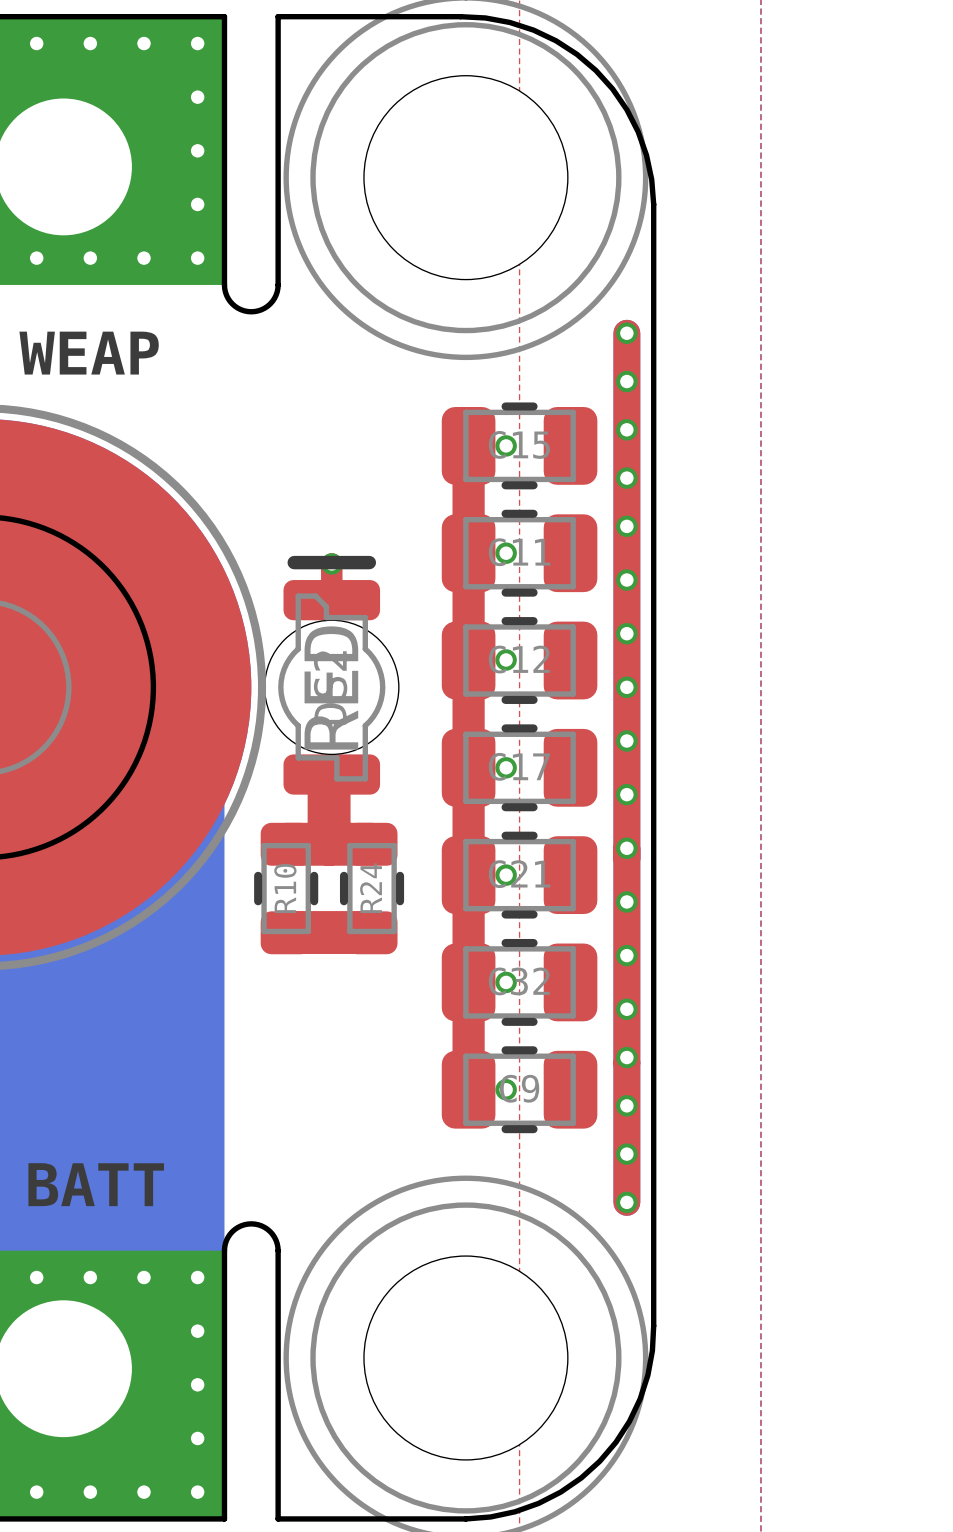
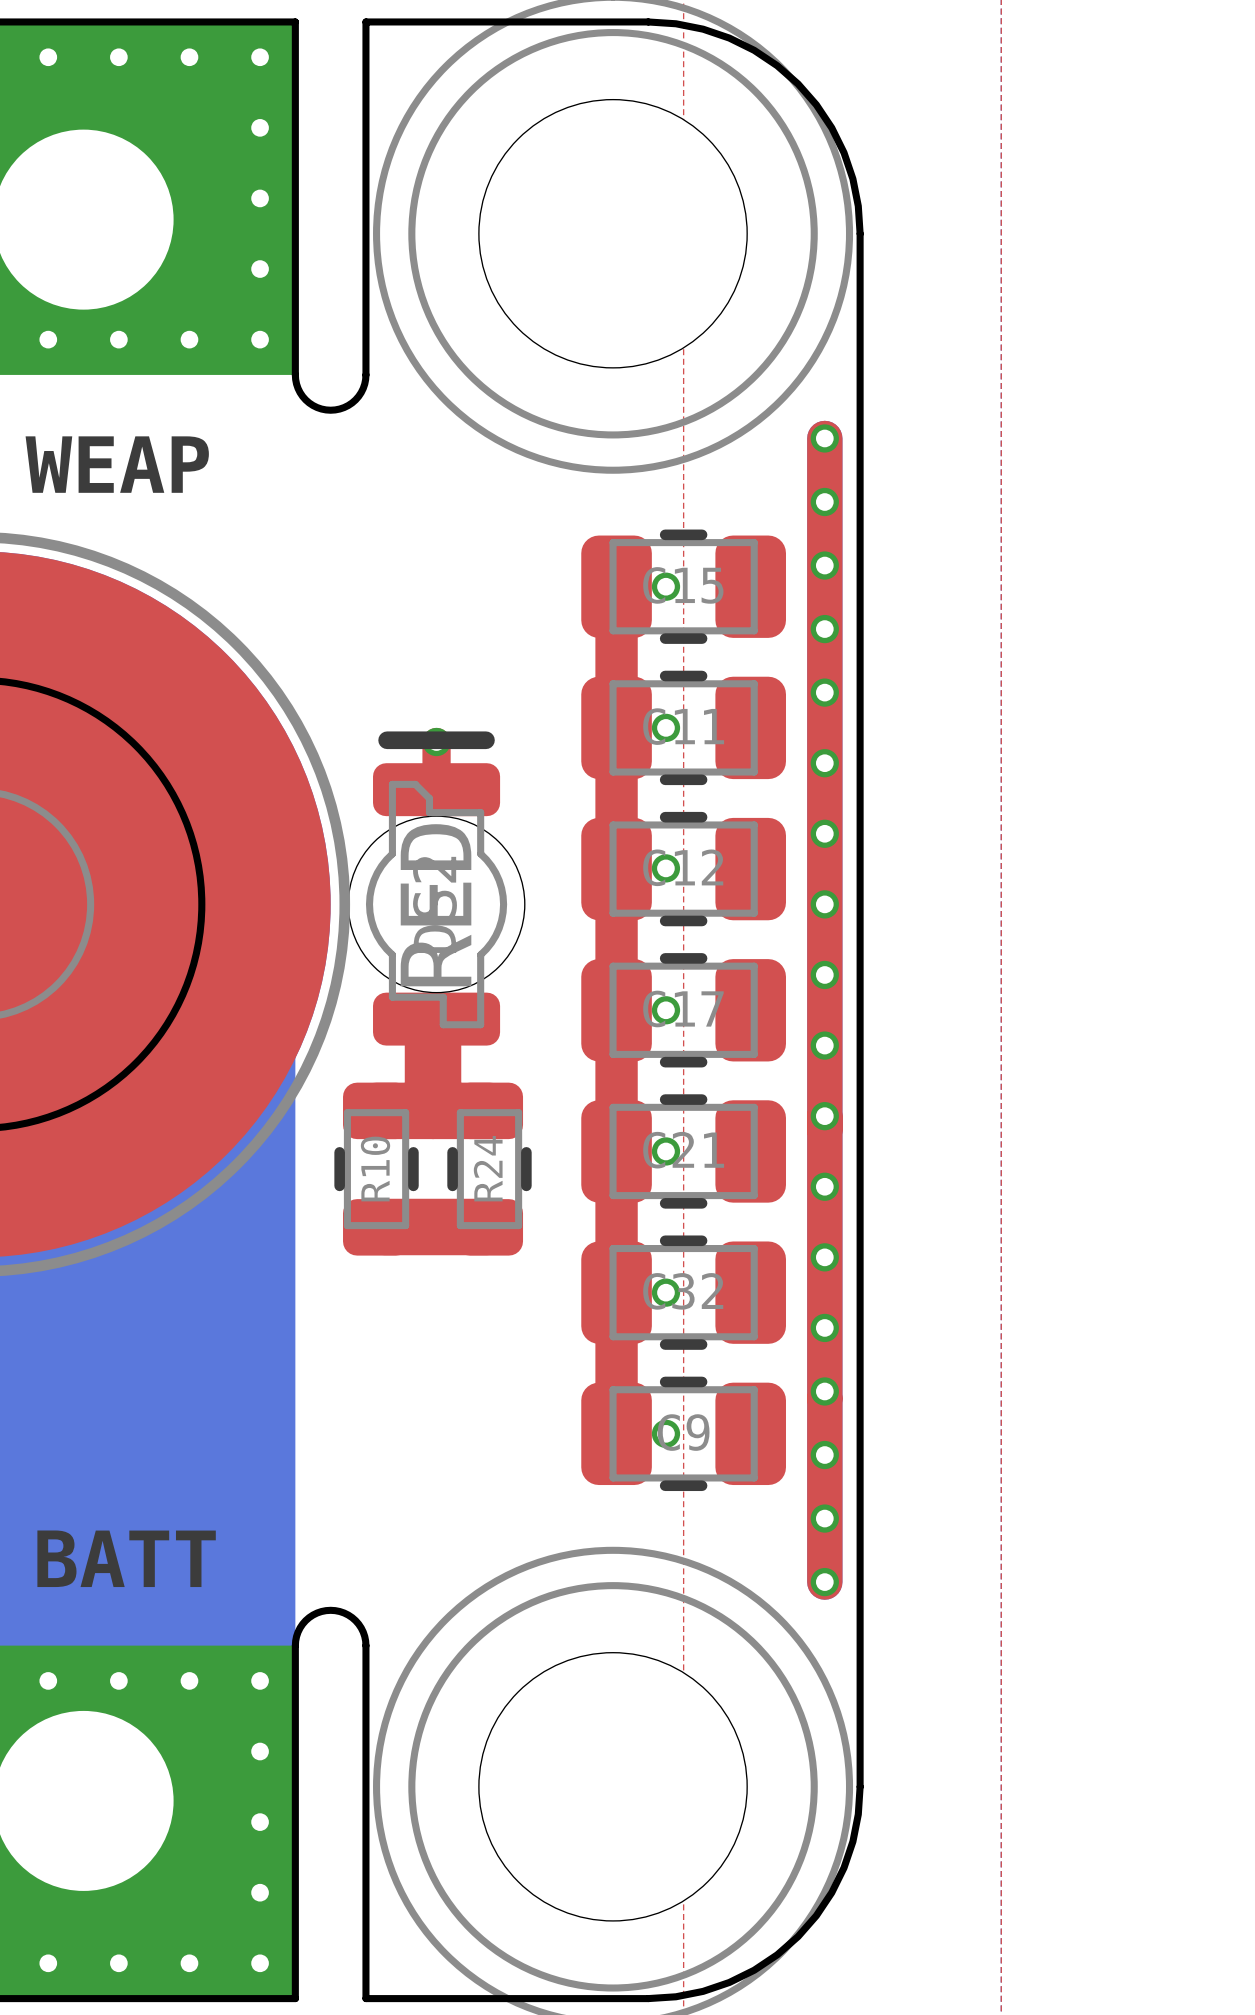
board edge: (460, 16) (485, 17) (509, 22) (533, 30) (556, 40) (577, 54) (596, 70) (612, 89) (626, 109) (638, 131) (646, 155) (651, 179) (653, 204) -> (605, 21) (675, 23) (703, 29) (729, 38) (754, 50) (777, 65) (798, 83) (816, 104) (831, 127) (843, 152) (852, 178) (858, 206) (860, 269)
board edge: (653, 1325) (652, 1350) (647, 1375) (640, 1398) (629, 1421) (615, 1442) (599, 1461) (581, 1477) (560, 1492) (538, 1503) (515, 1511) (490, 1516) (465, 1518) -> (860, 1744) (858, 1814) (852, 1841) (843, 1867) (831, 1892) (816, 1915) (798, 1936) (777, 1954) (754, 1970) (729, 1982) (703, 1991) (675, 1996) (613, 1998)

